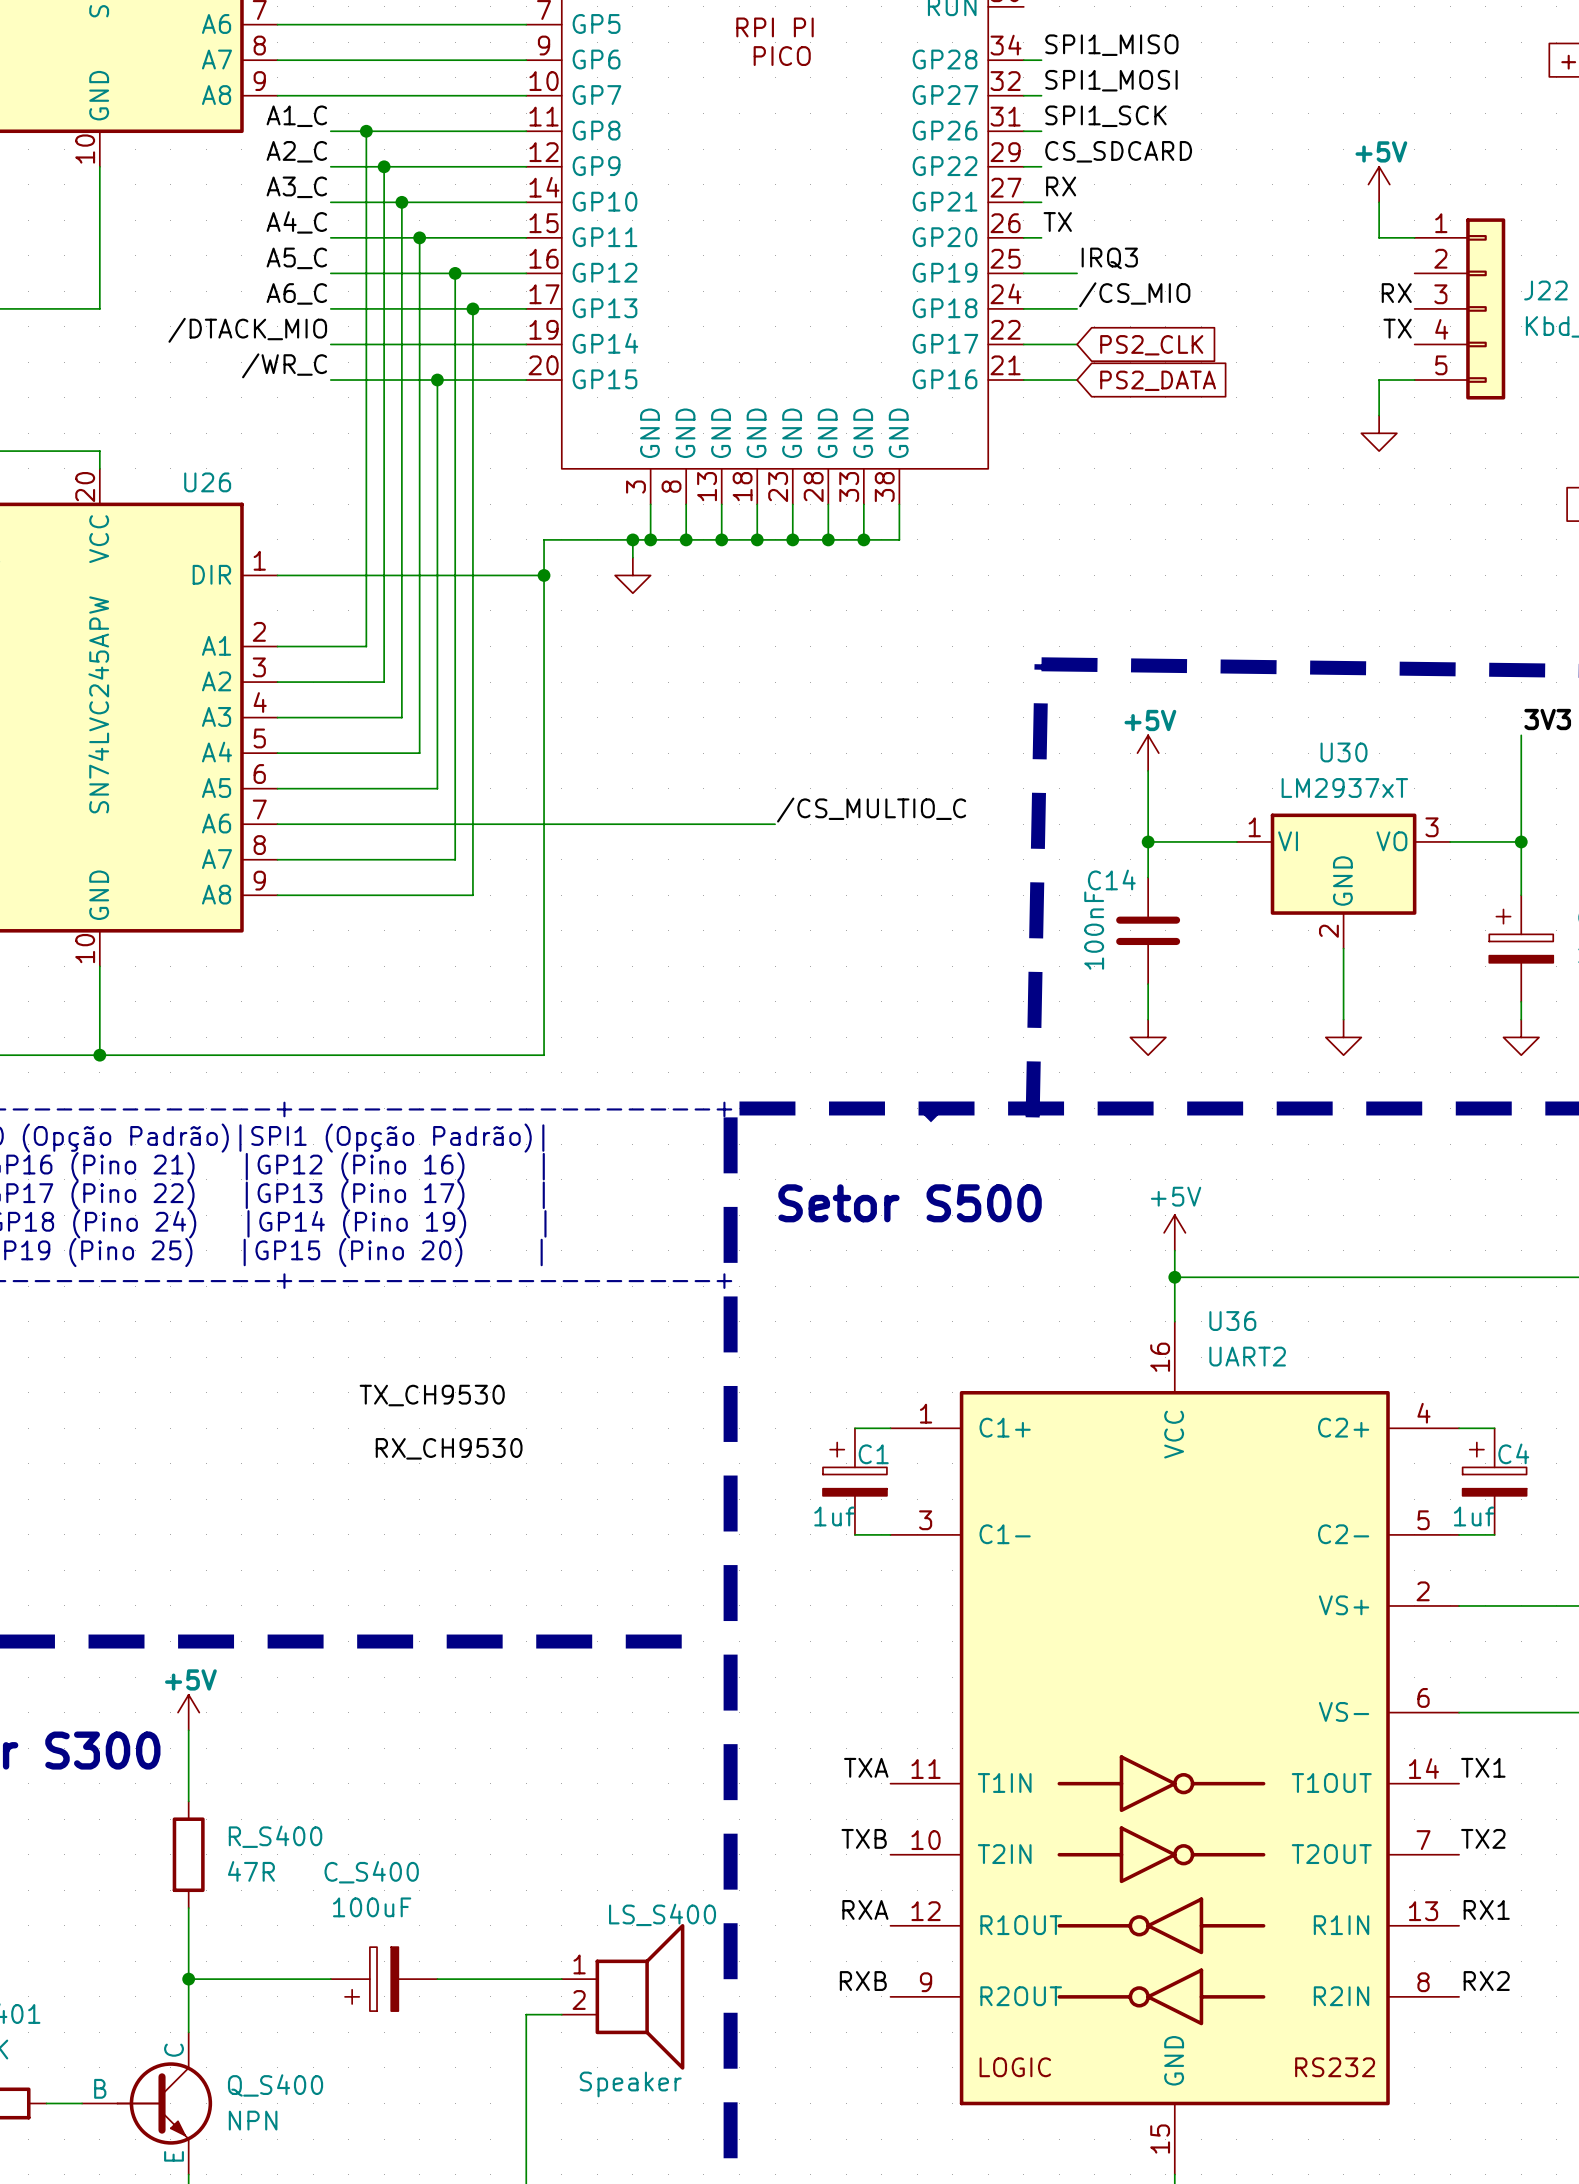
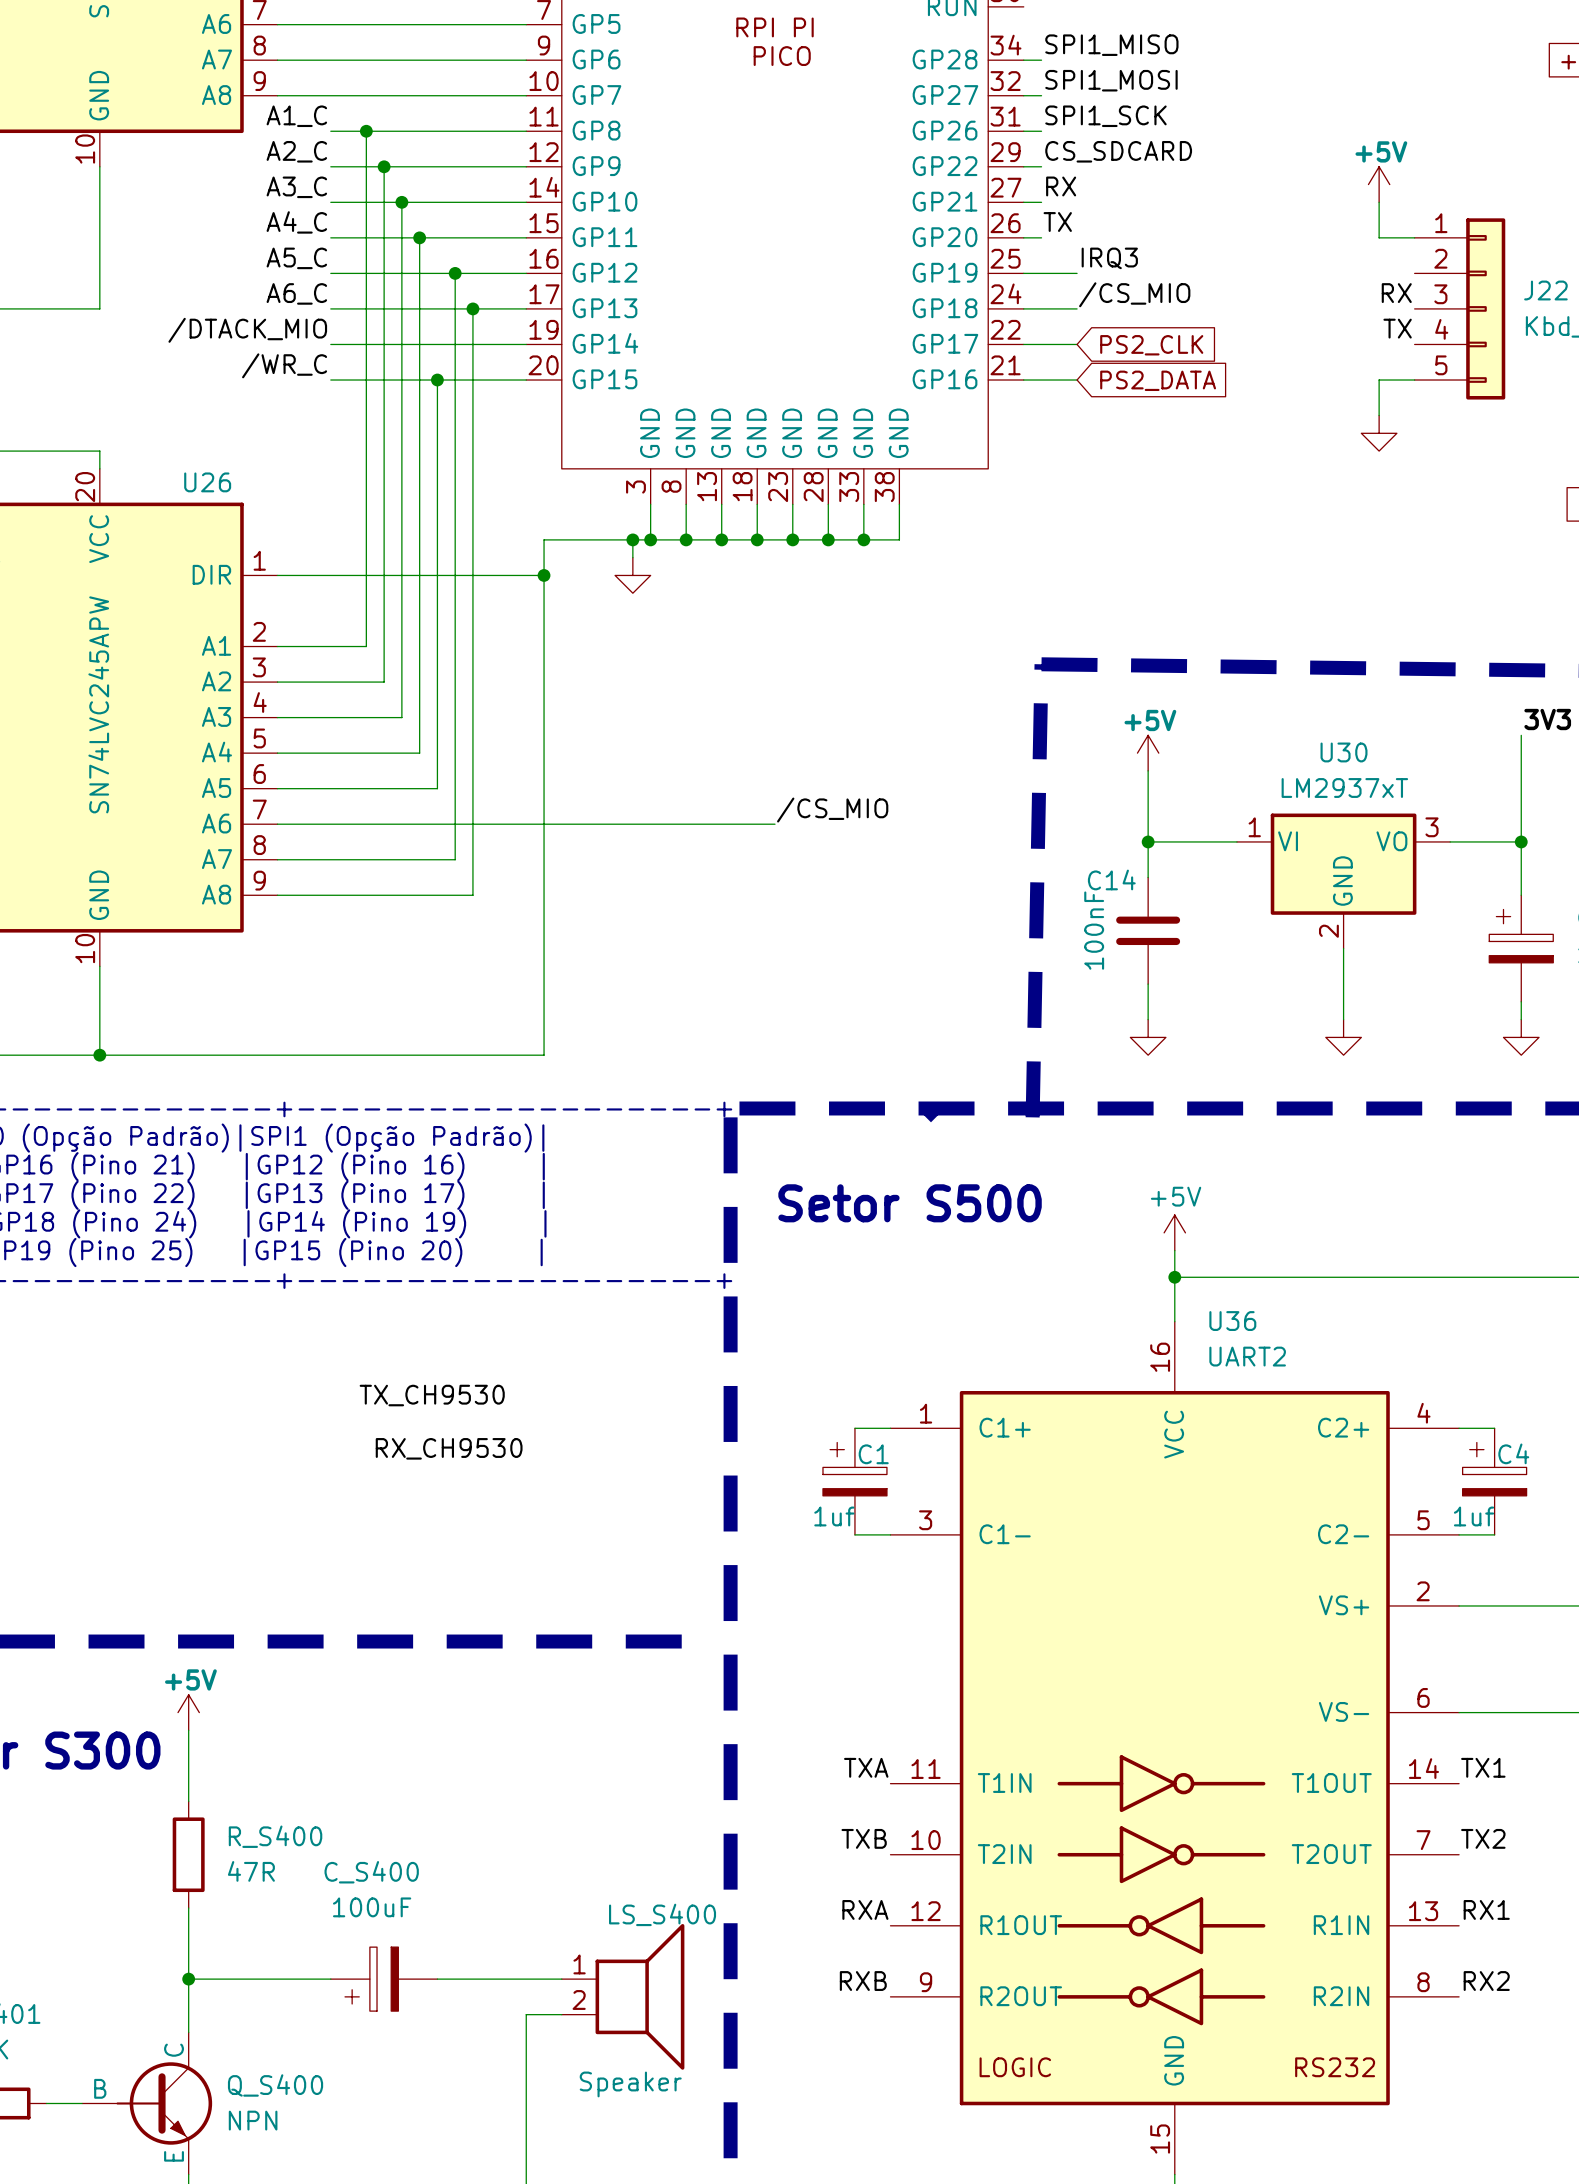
label: /CS_MULTIO_C (871, 810) -> /CS_MIO (832, 810)

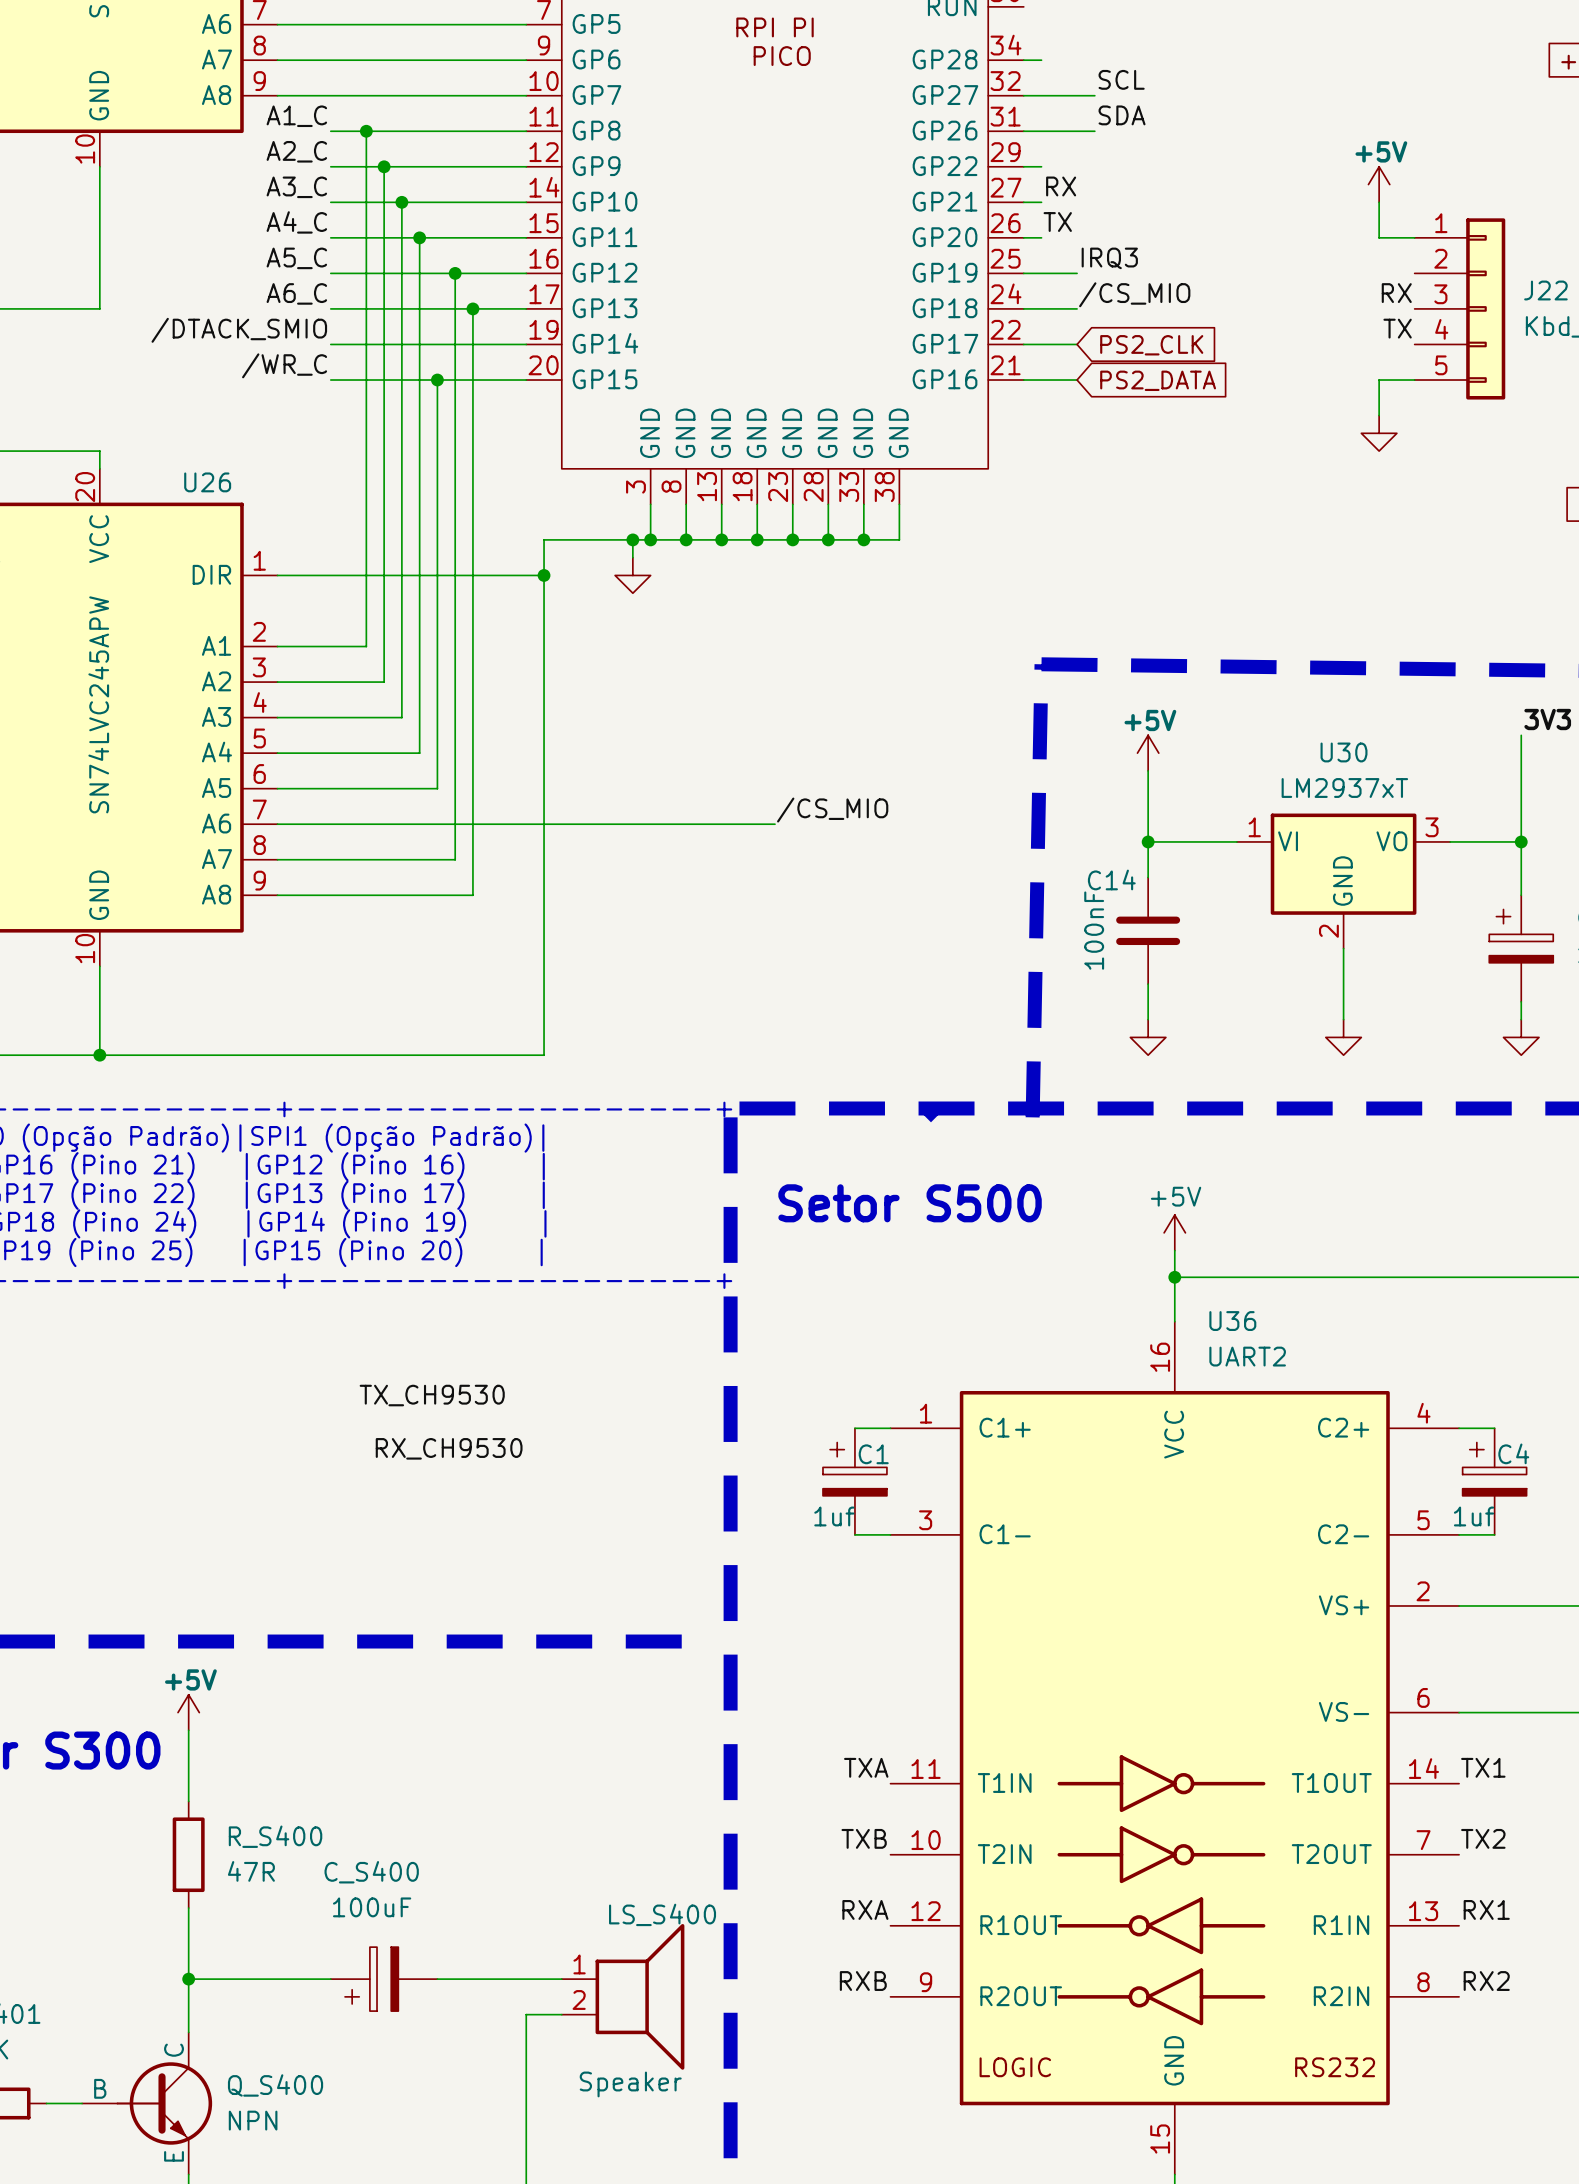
label: SPI1_MISO (1111, 45) -> none
label: none -> SCL (1121, 79)
label: SPI1_MOSI (1111, 80) -> none
wire: none -> (1041, 95) (1094, 95)
label: none -> SDA (1122, 115)
label: SPI1_SCK (1105, 116) -> none
wire: none -> (1041, 131) (1094, 131)
label: CS_SDCARD (1118, 151) -> none
label: /DTACK_MIO (247, 330) -> /DTACK_SMIO (239, 330)

